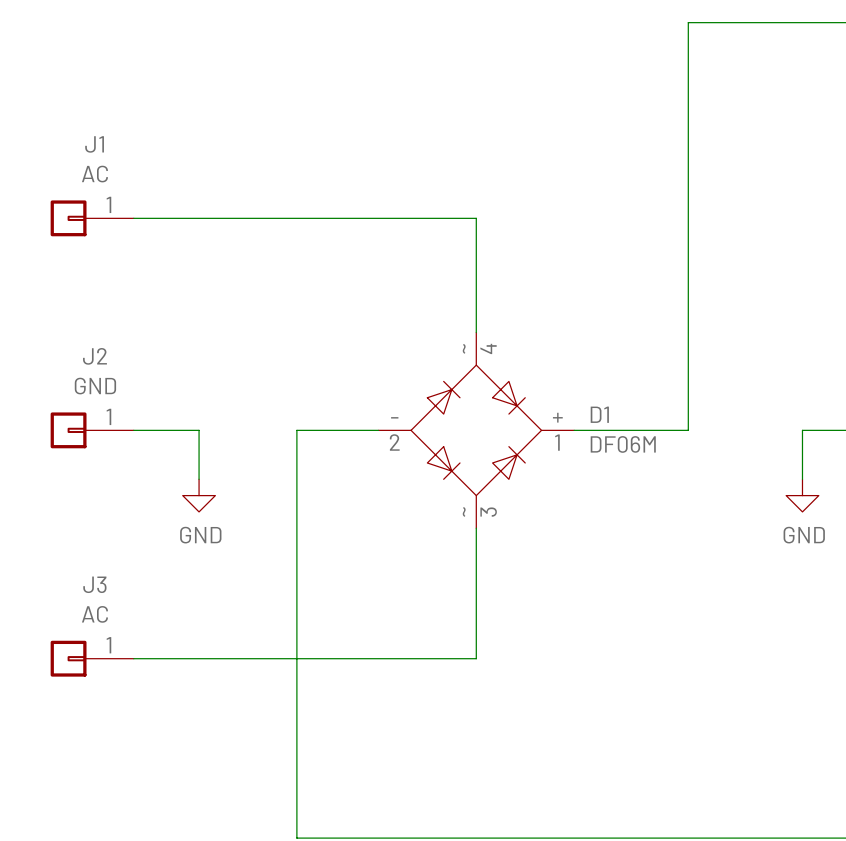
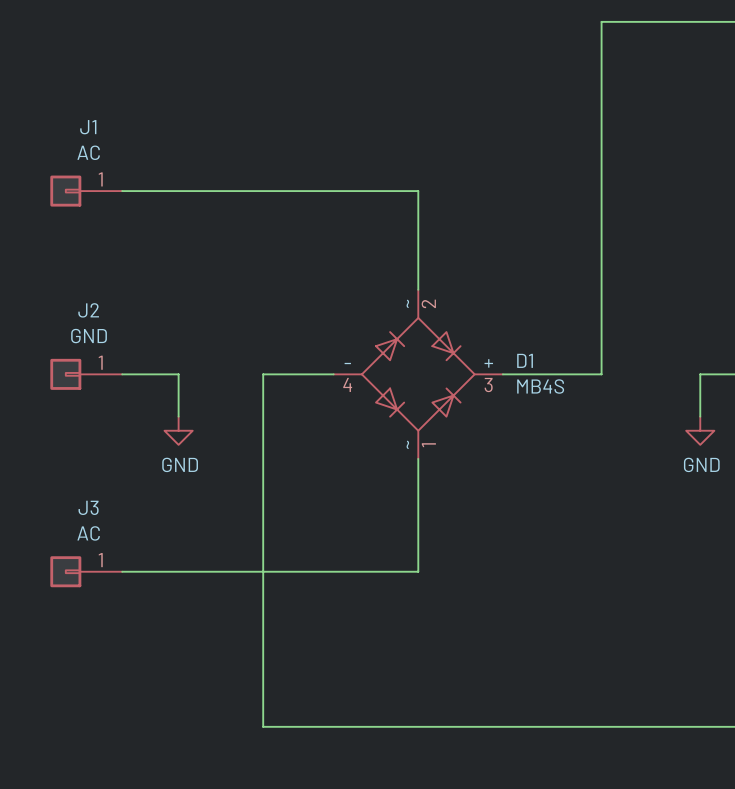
D1 pin number: 4 (488, 348) -> 2 (428, 303)
D1 pin number: 2 (394, 442) -> 4 (347, 384)
D1 pin number: 1 (557, 442) -> 3 (488, 385)
D1 value: DF06M (623, 444) -> MB4S (540, 386)
D1 pin number: 3 (488, 512) -> 1 (428, 445)

